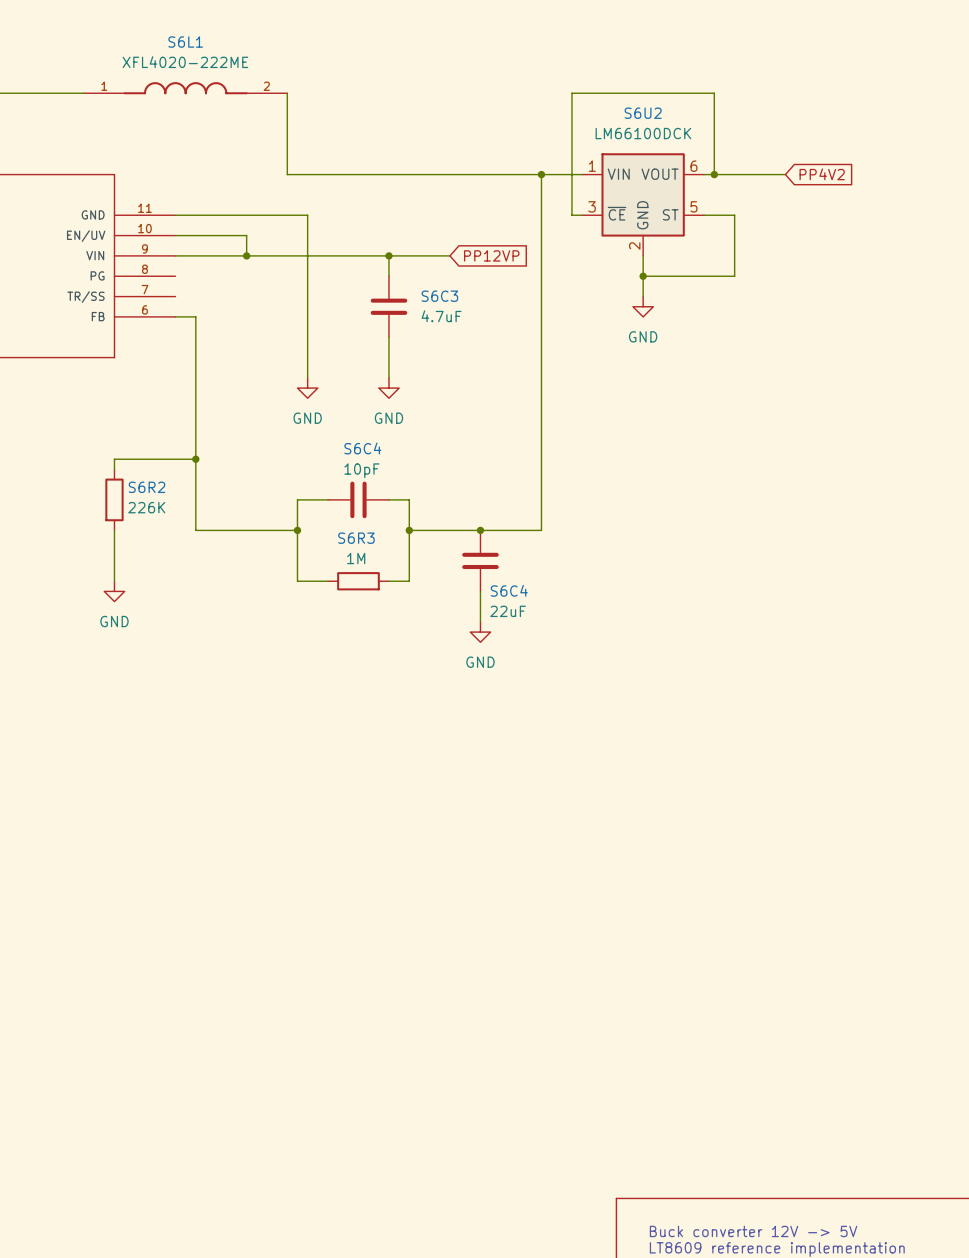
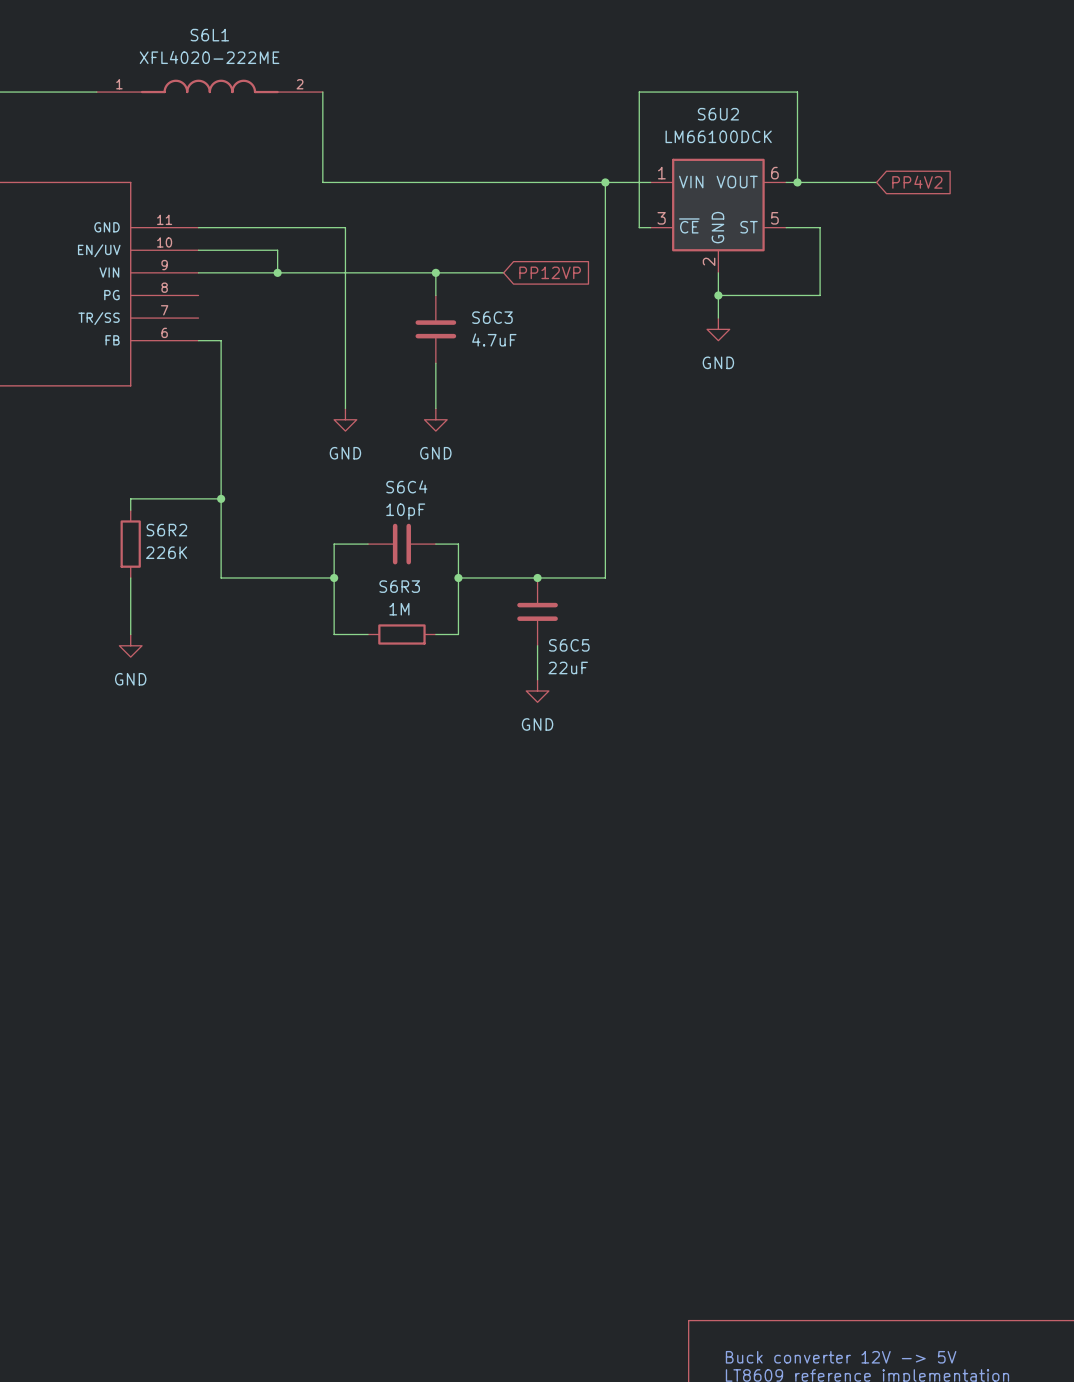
S6C4 name: S6C4 (509, 590) -> S6C5 (569, 645)

